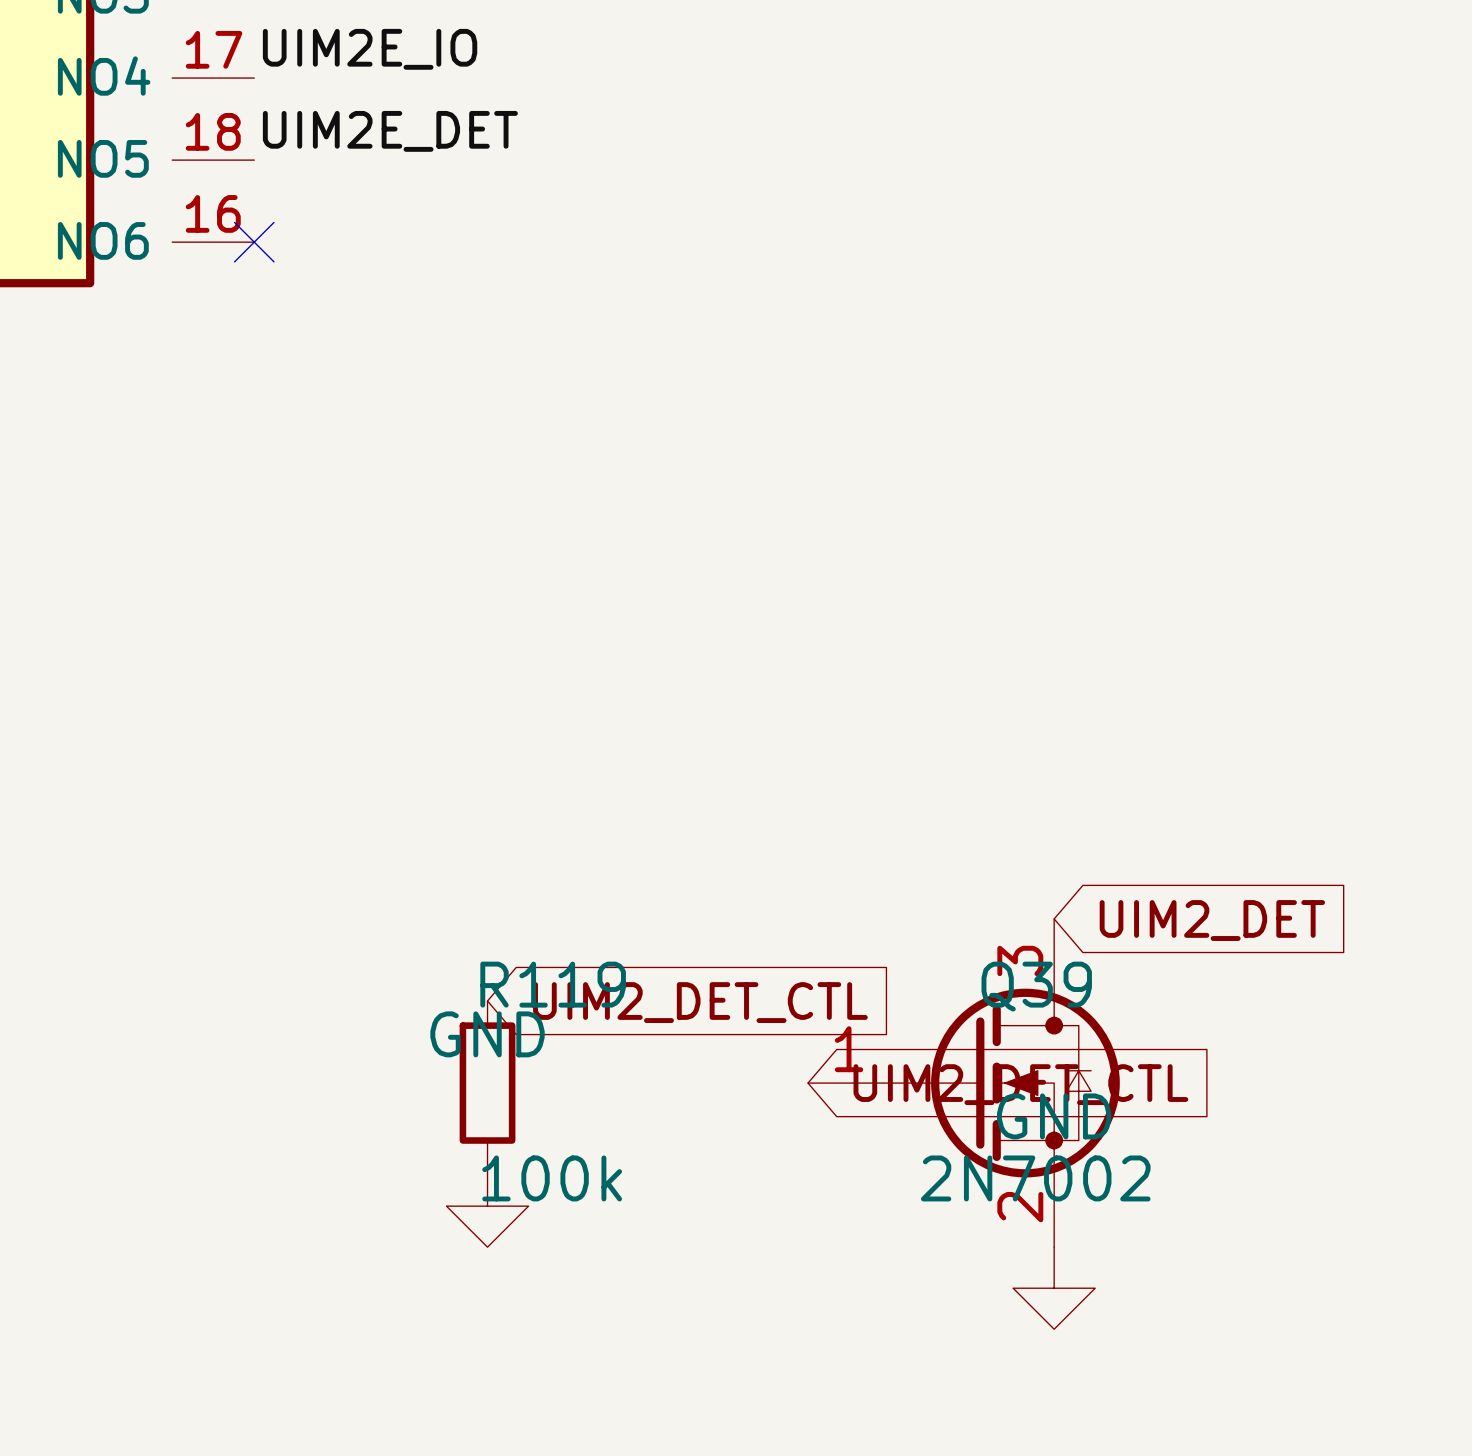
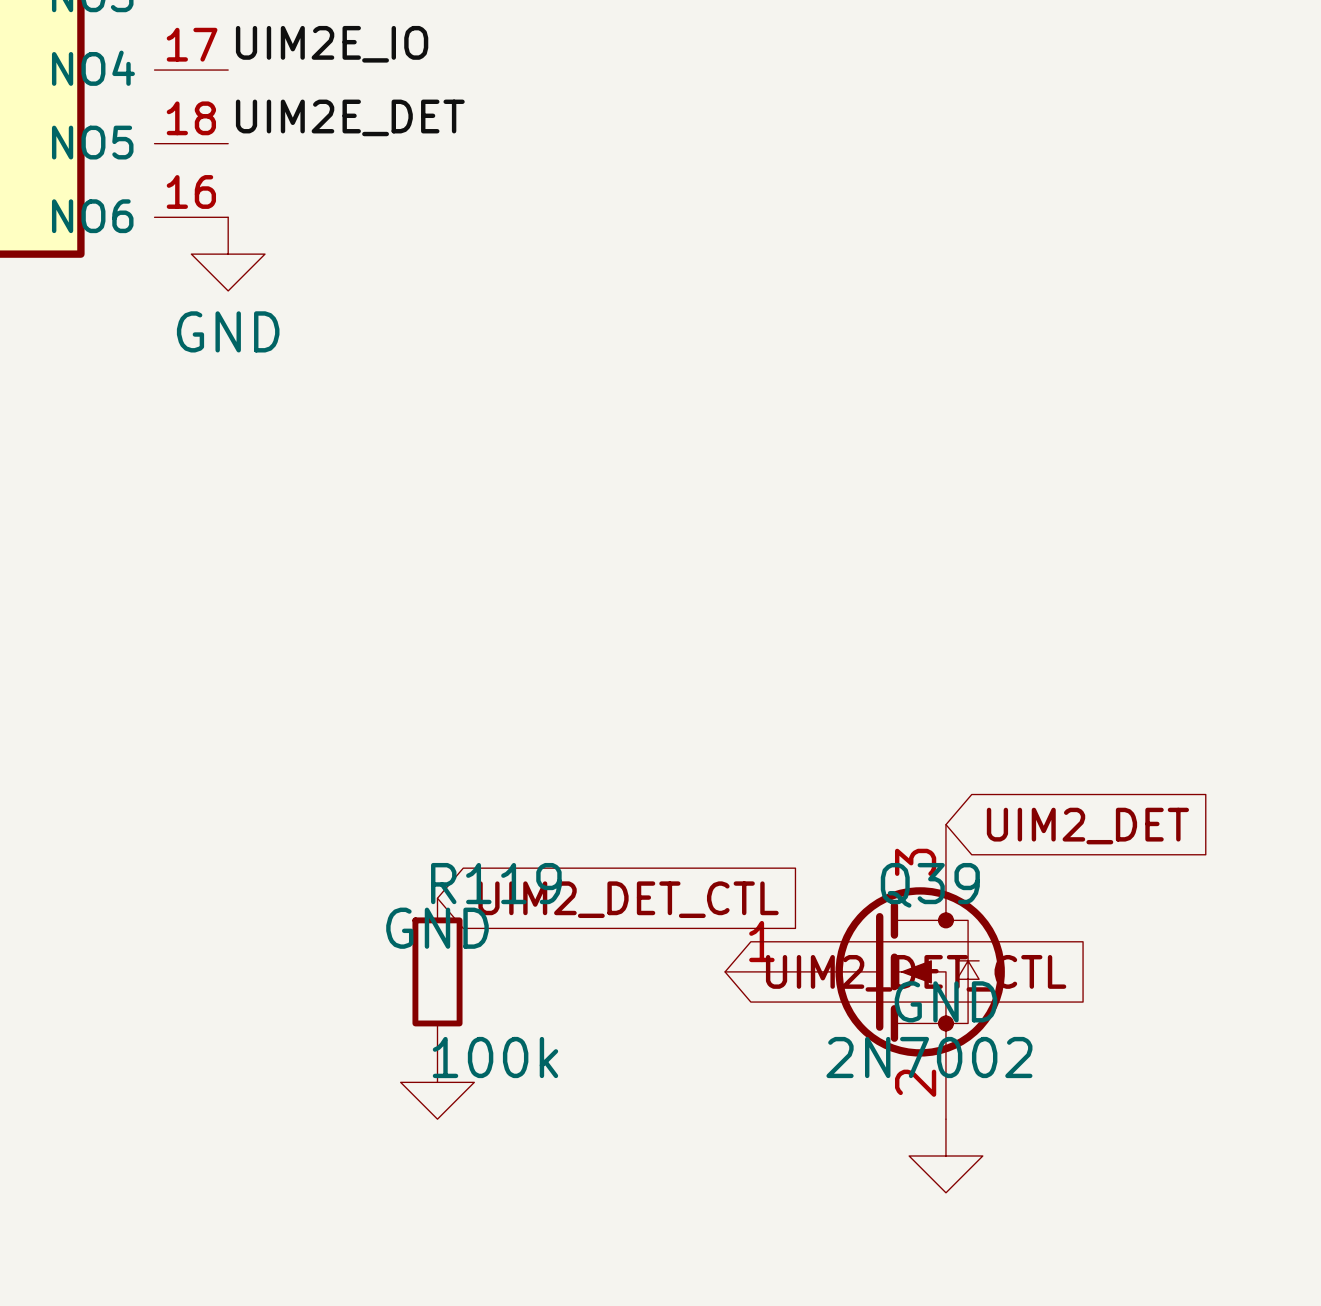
no-connect mark: (254, 242) -> none
power symbol: none -> GND (228, 254)

